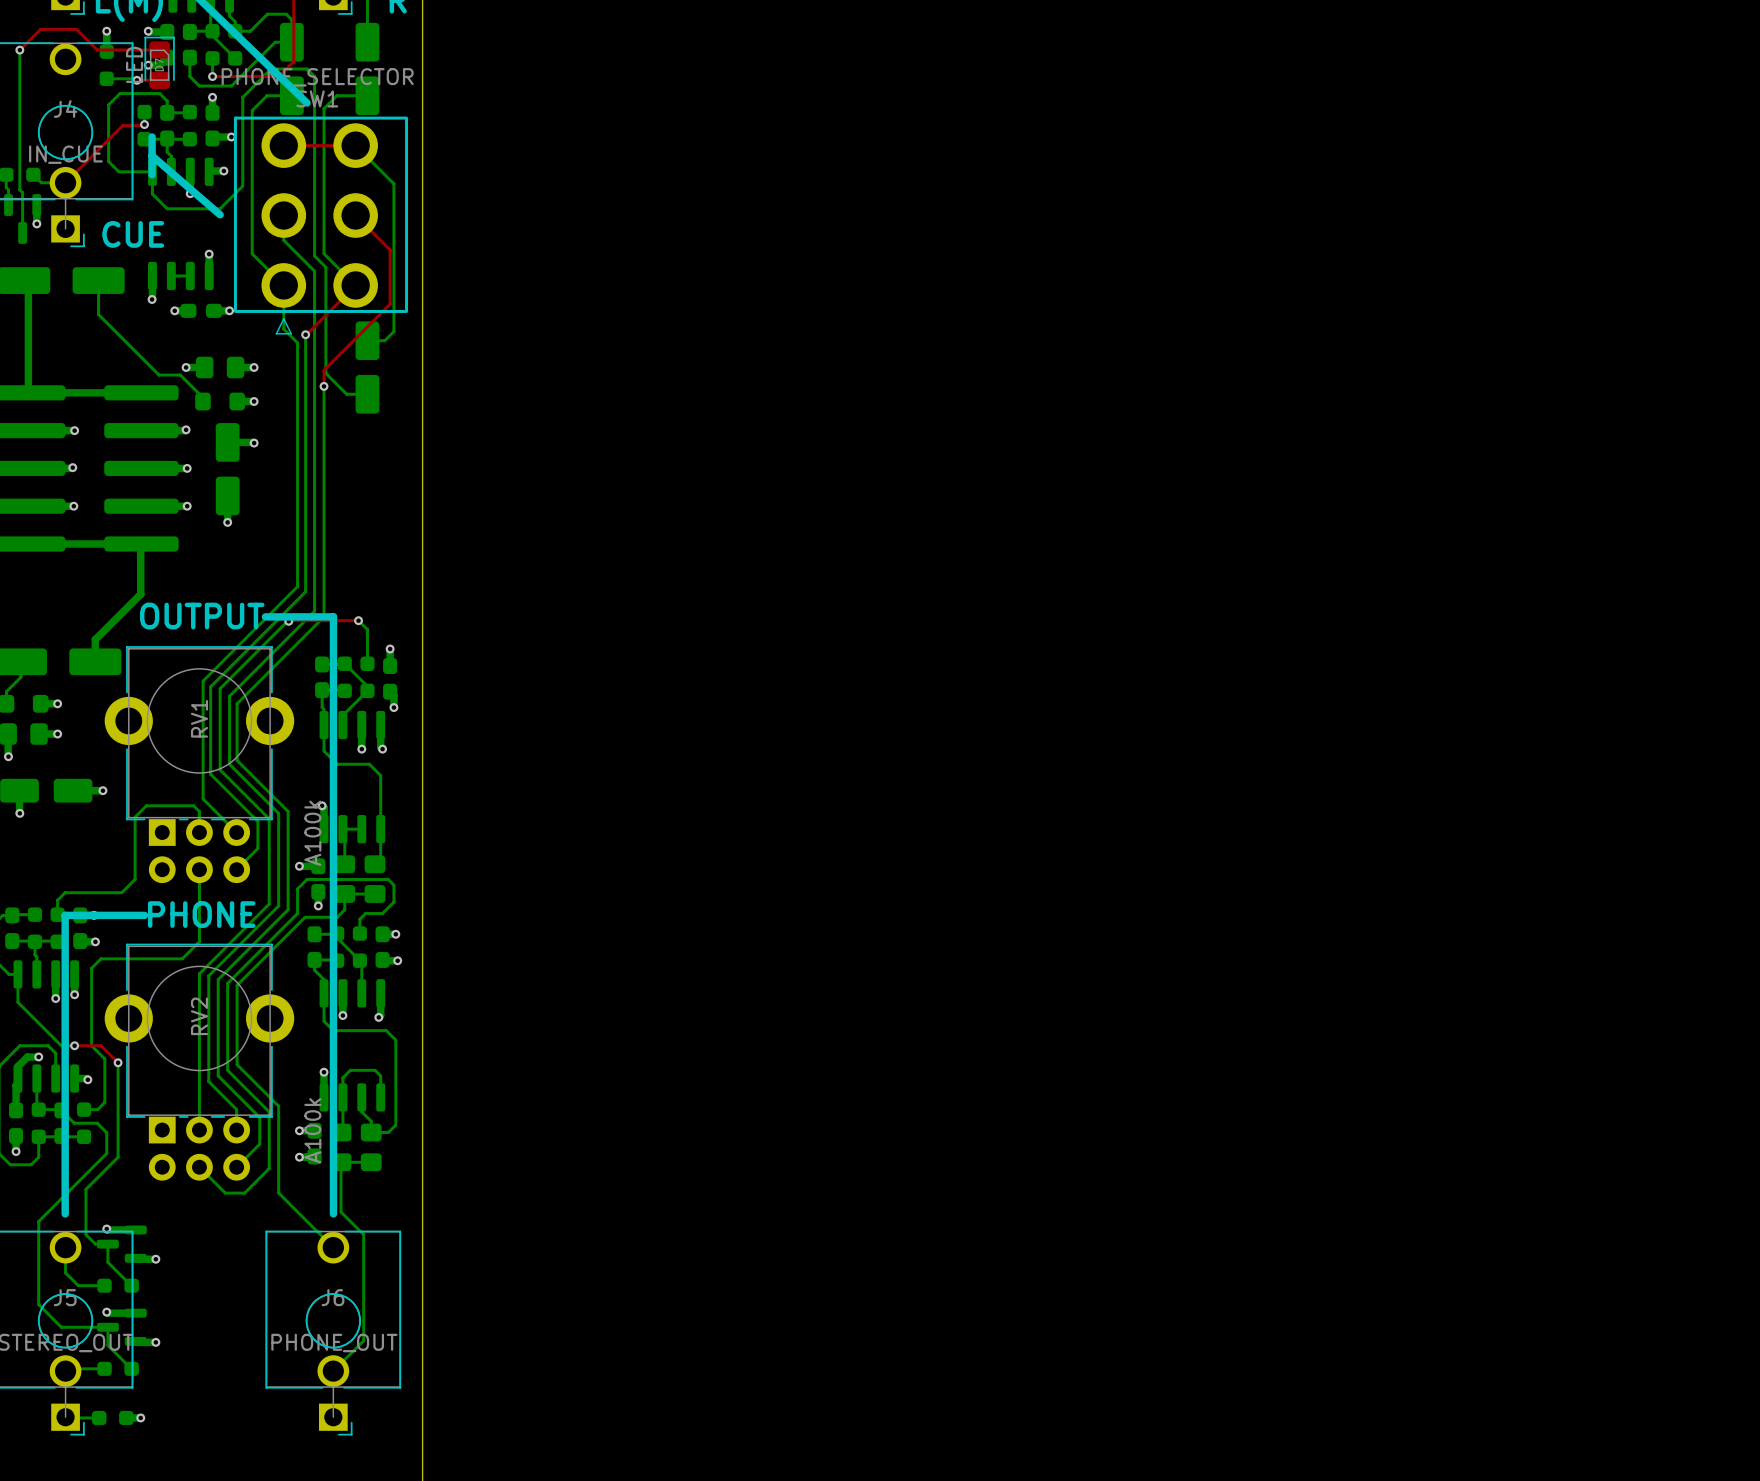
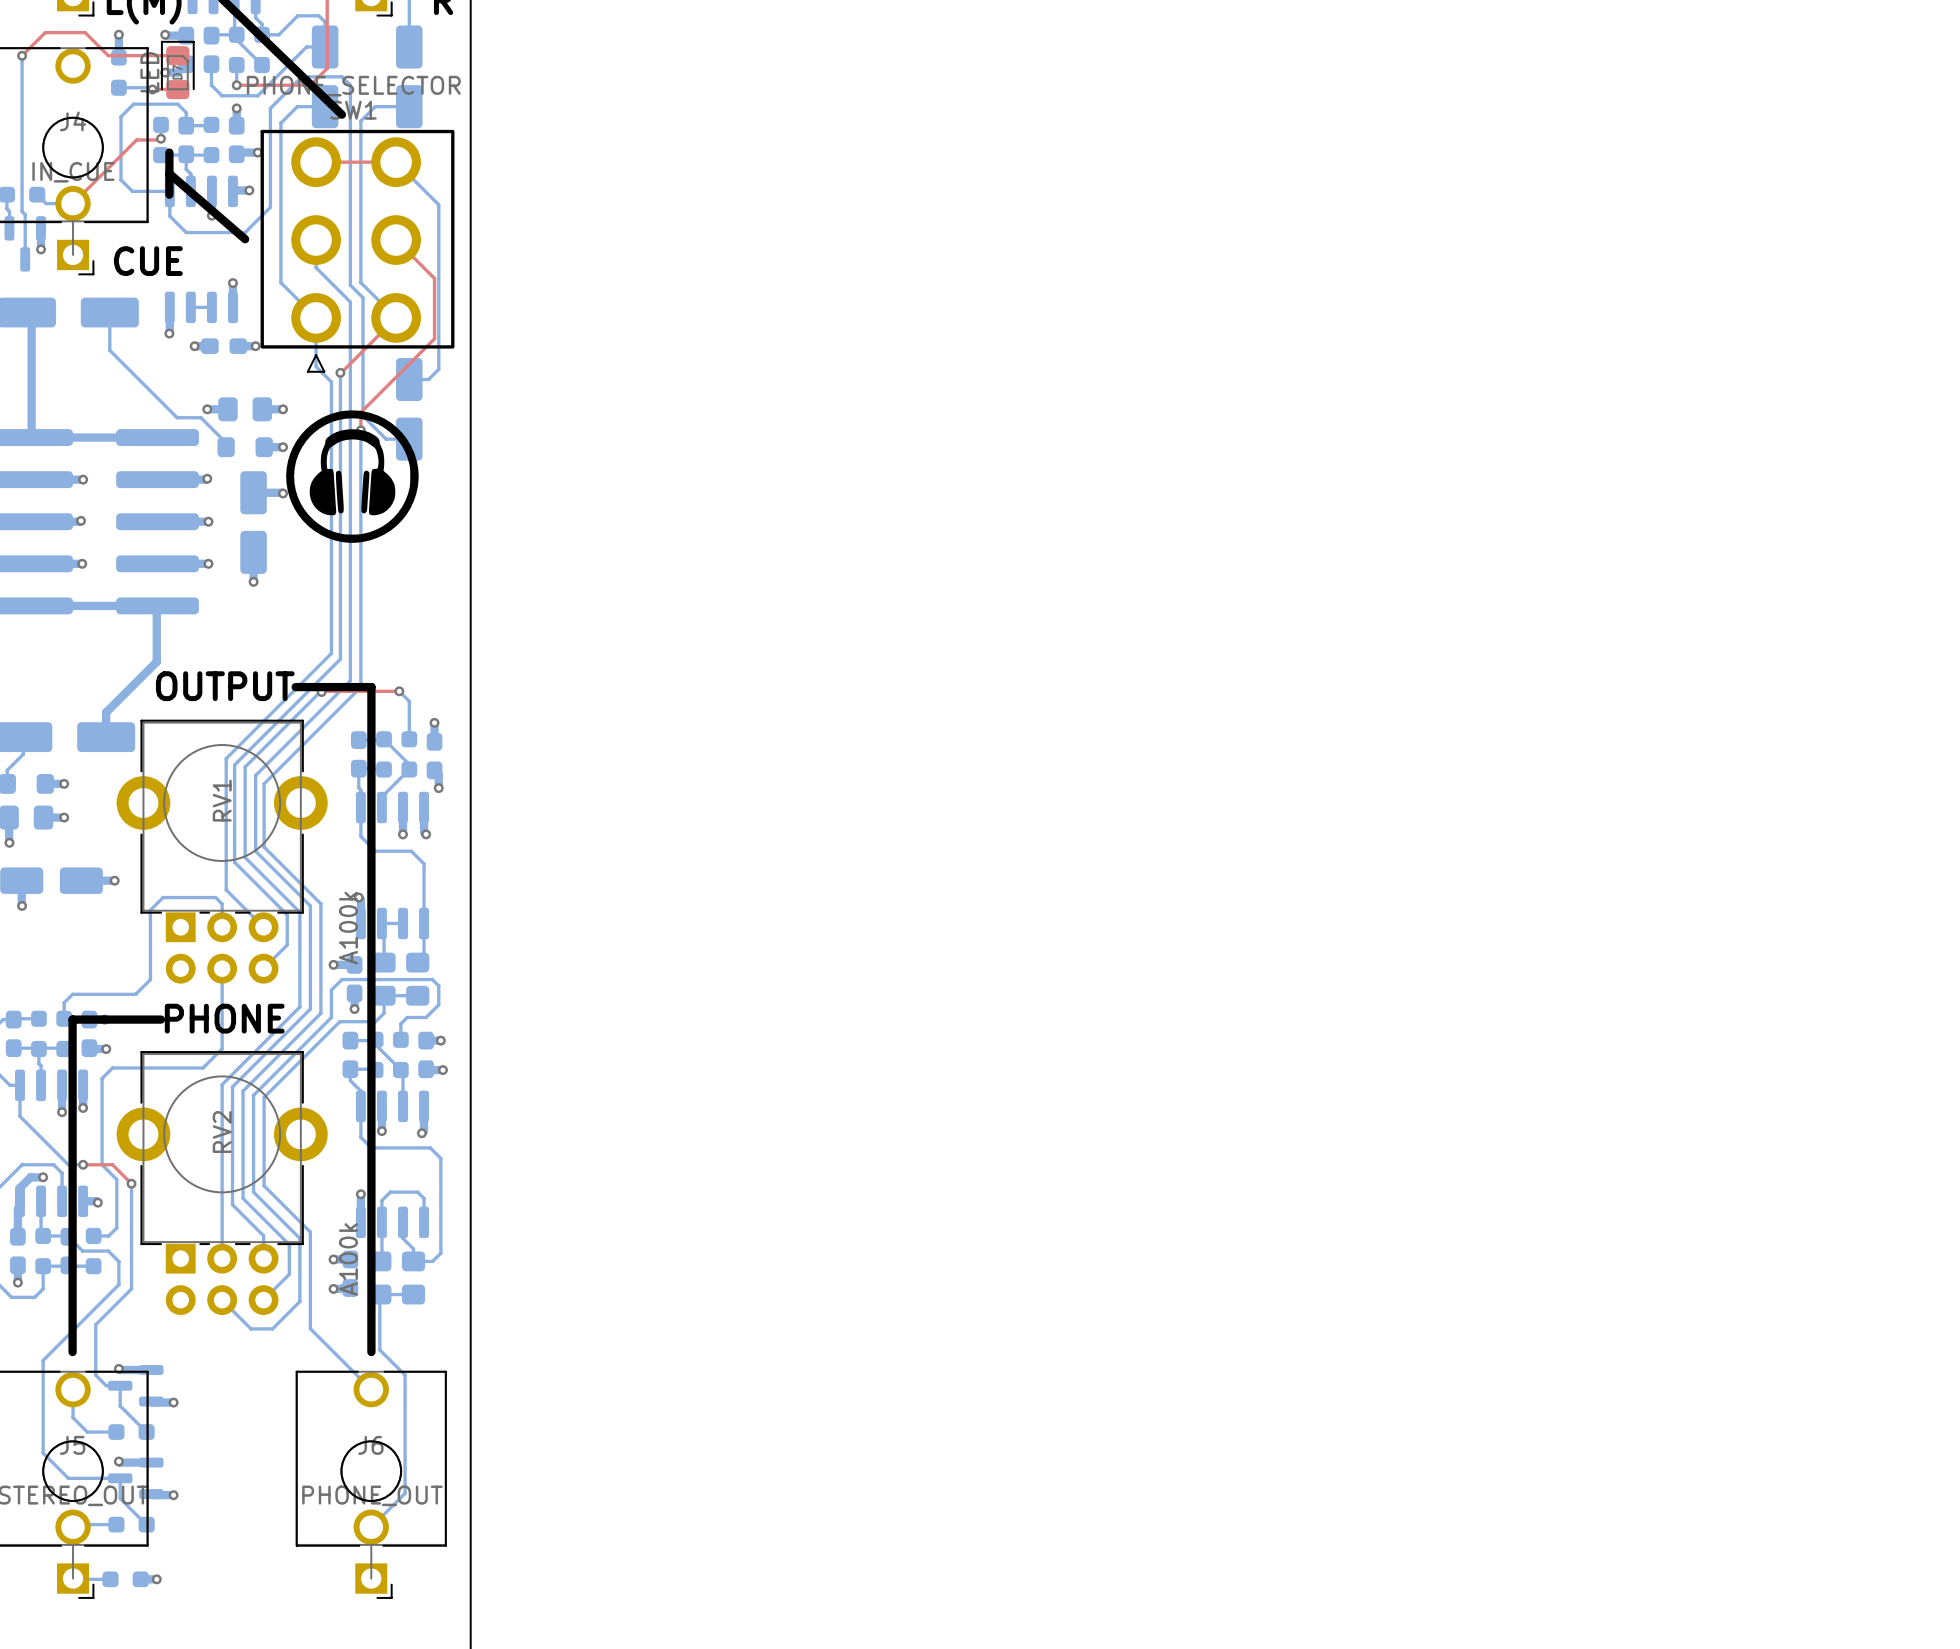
drawing: none -> [286, 410, 419, 543]

